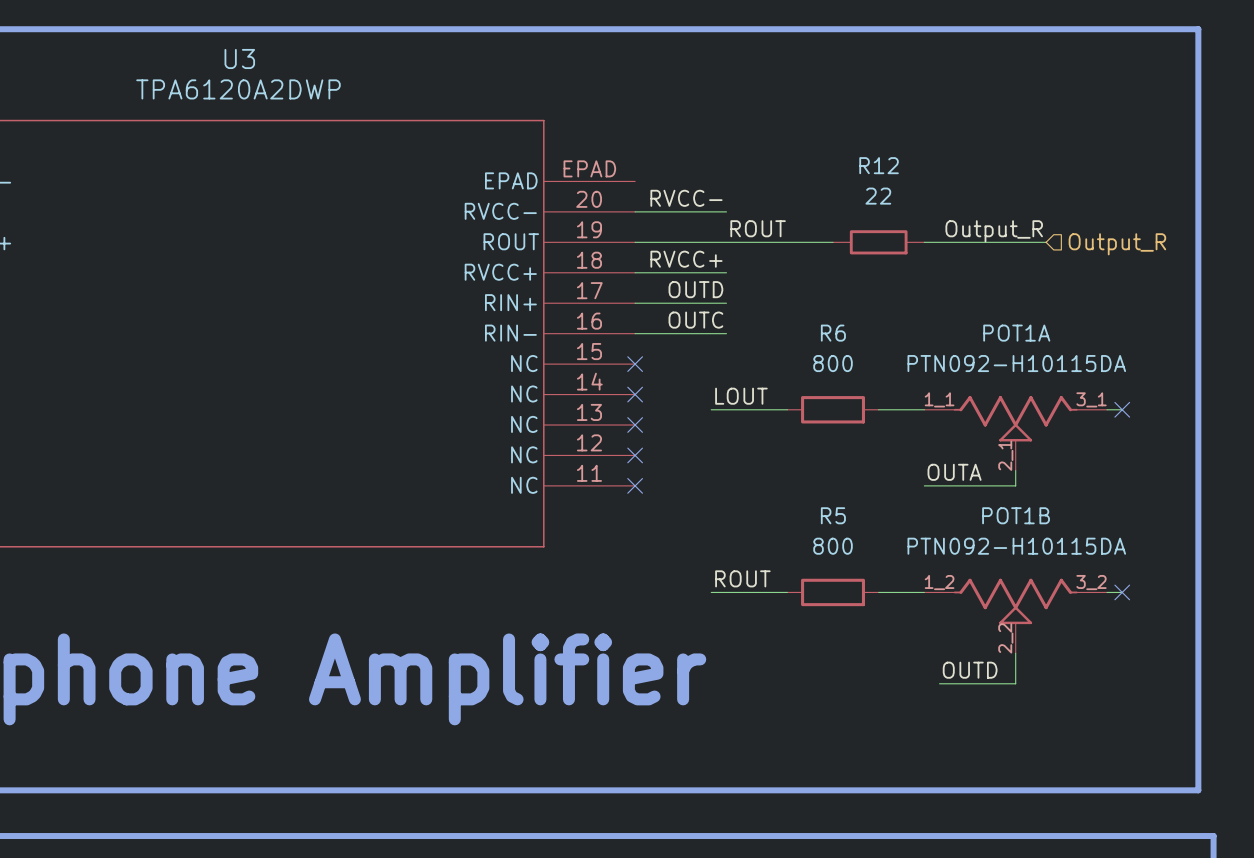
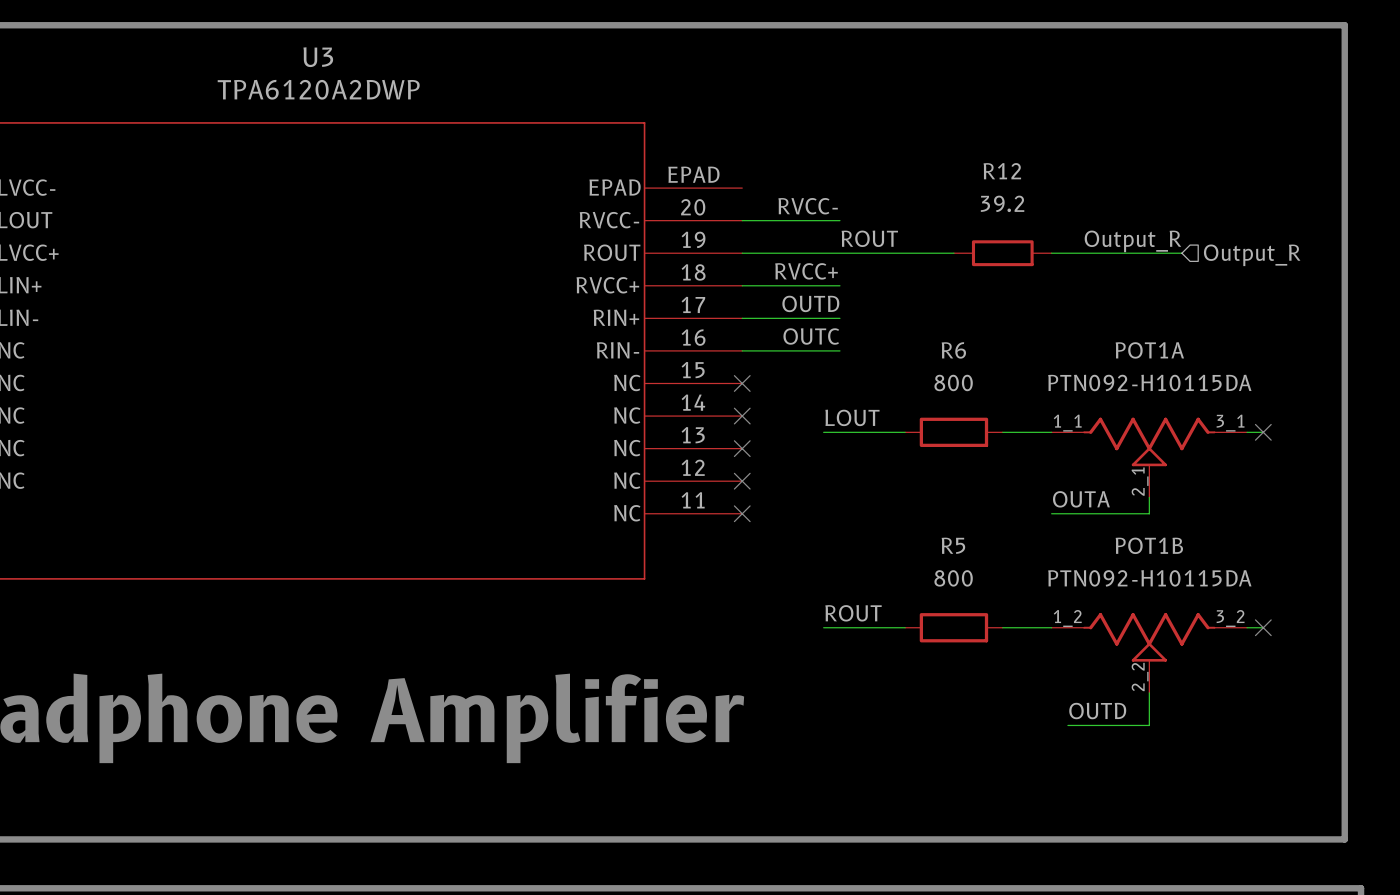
R12 value: 22 (878, 196) -> 39.2 (1002, 203)

